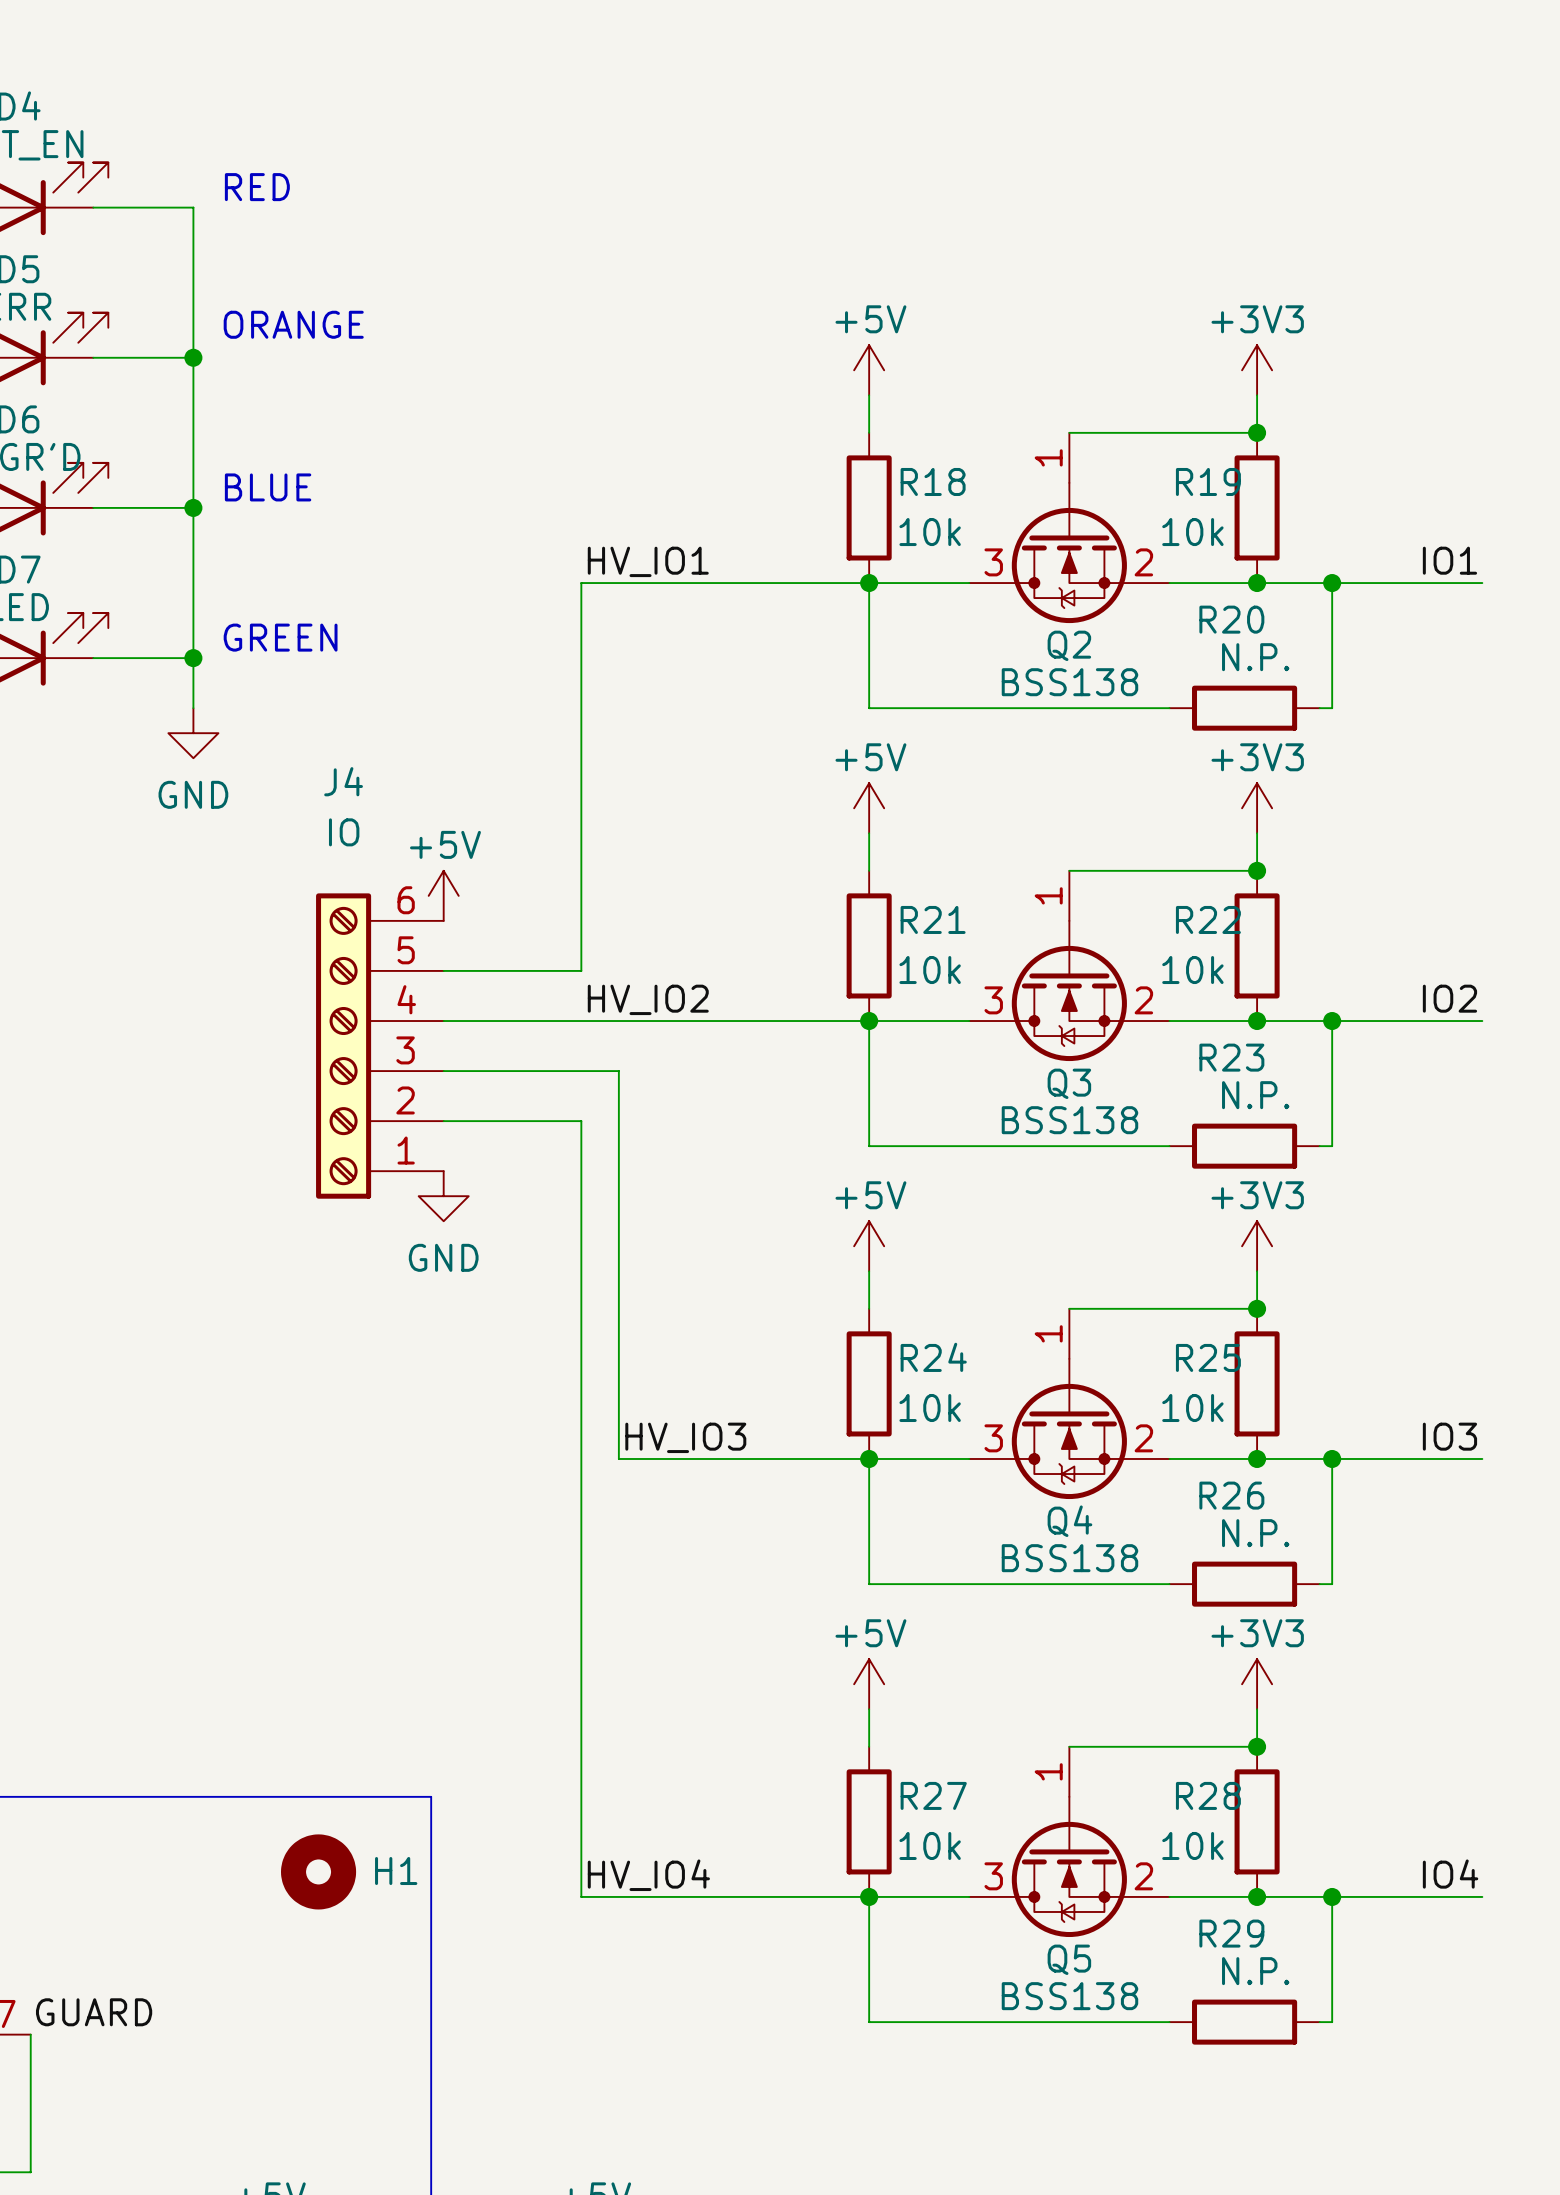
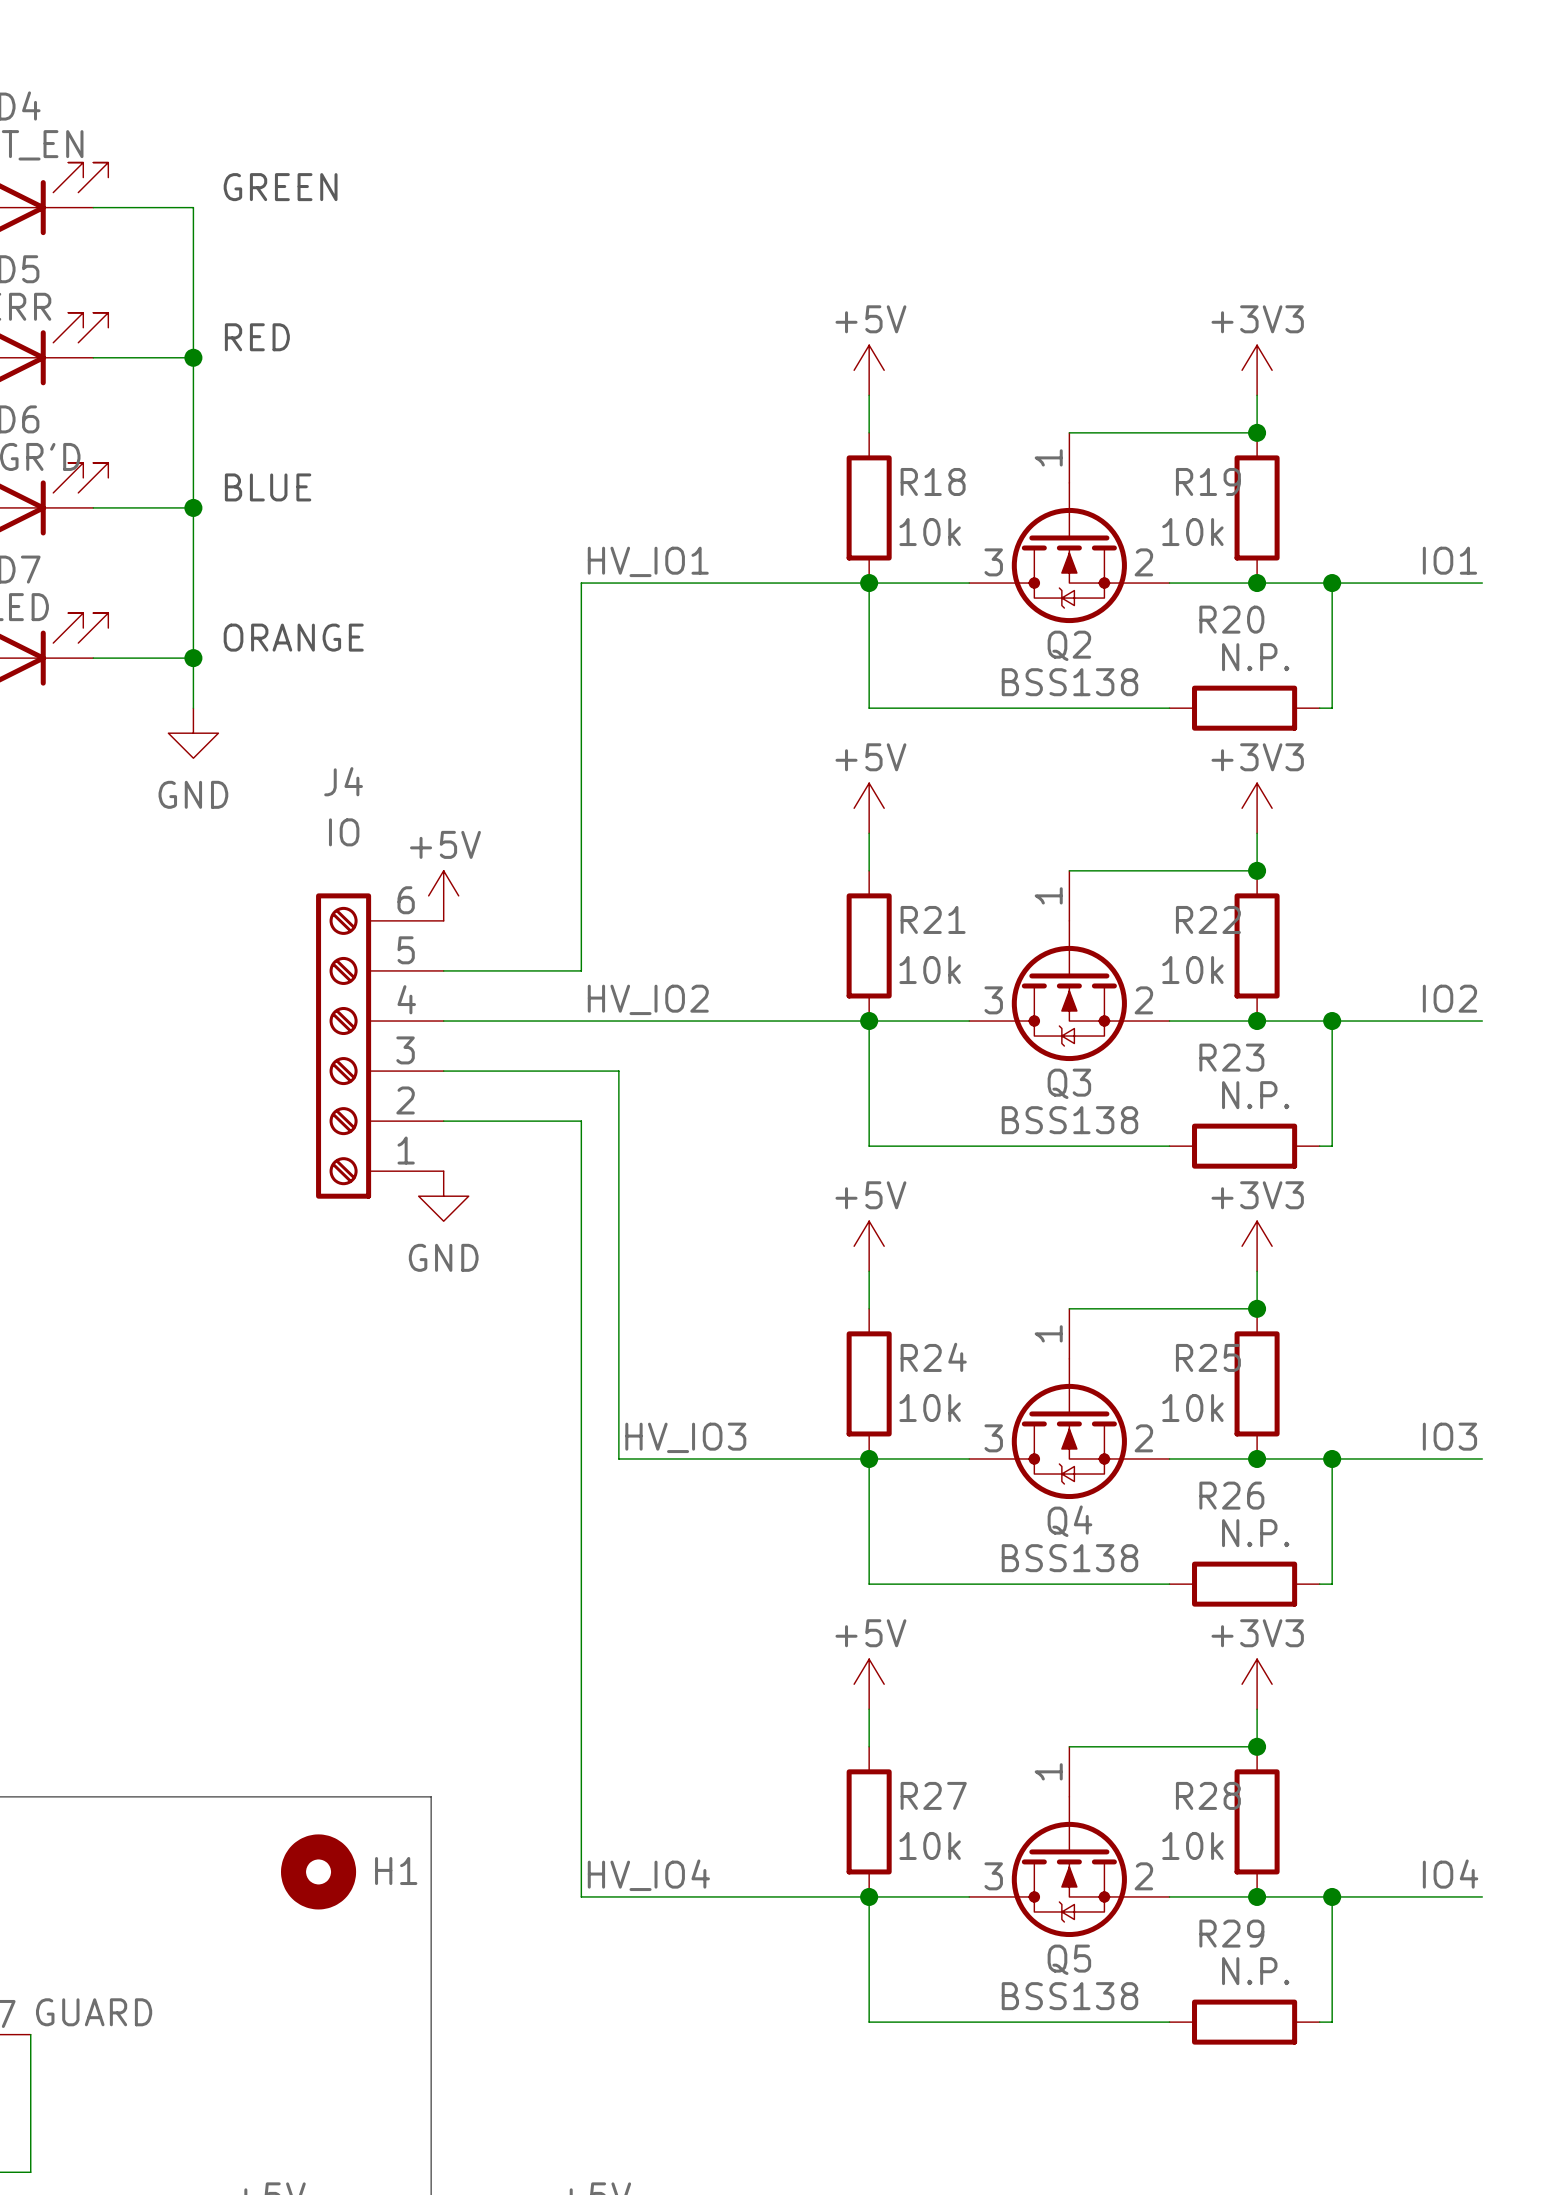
text: RED (257, 187) -> GREEN (280, 187)
text: ORANGE (293, 324) -> RED (257, 337)
text: GREEN (280, 637) -> ORANGE (293, 637)

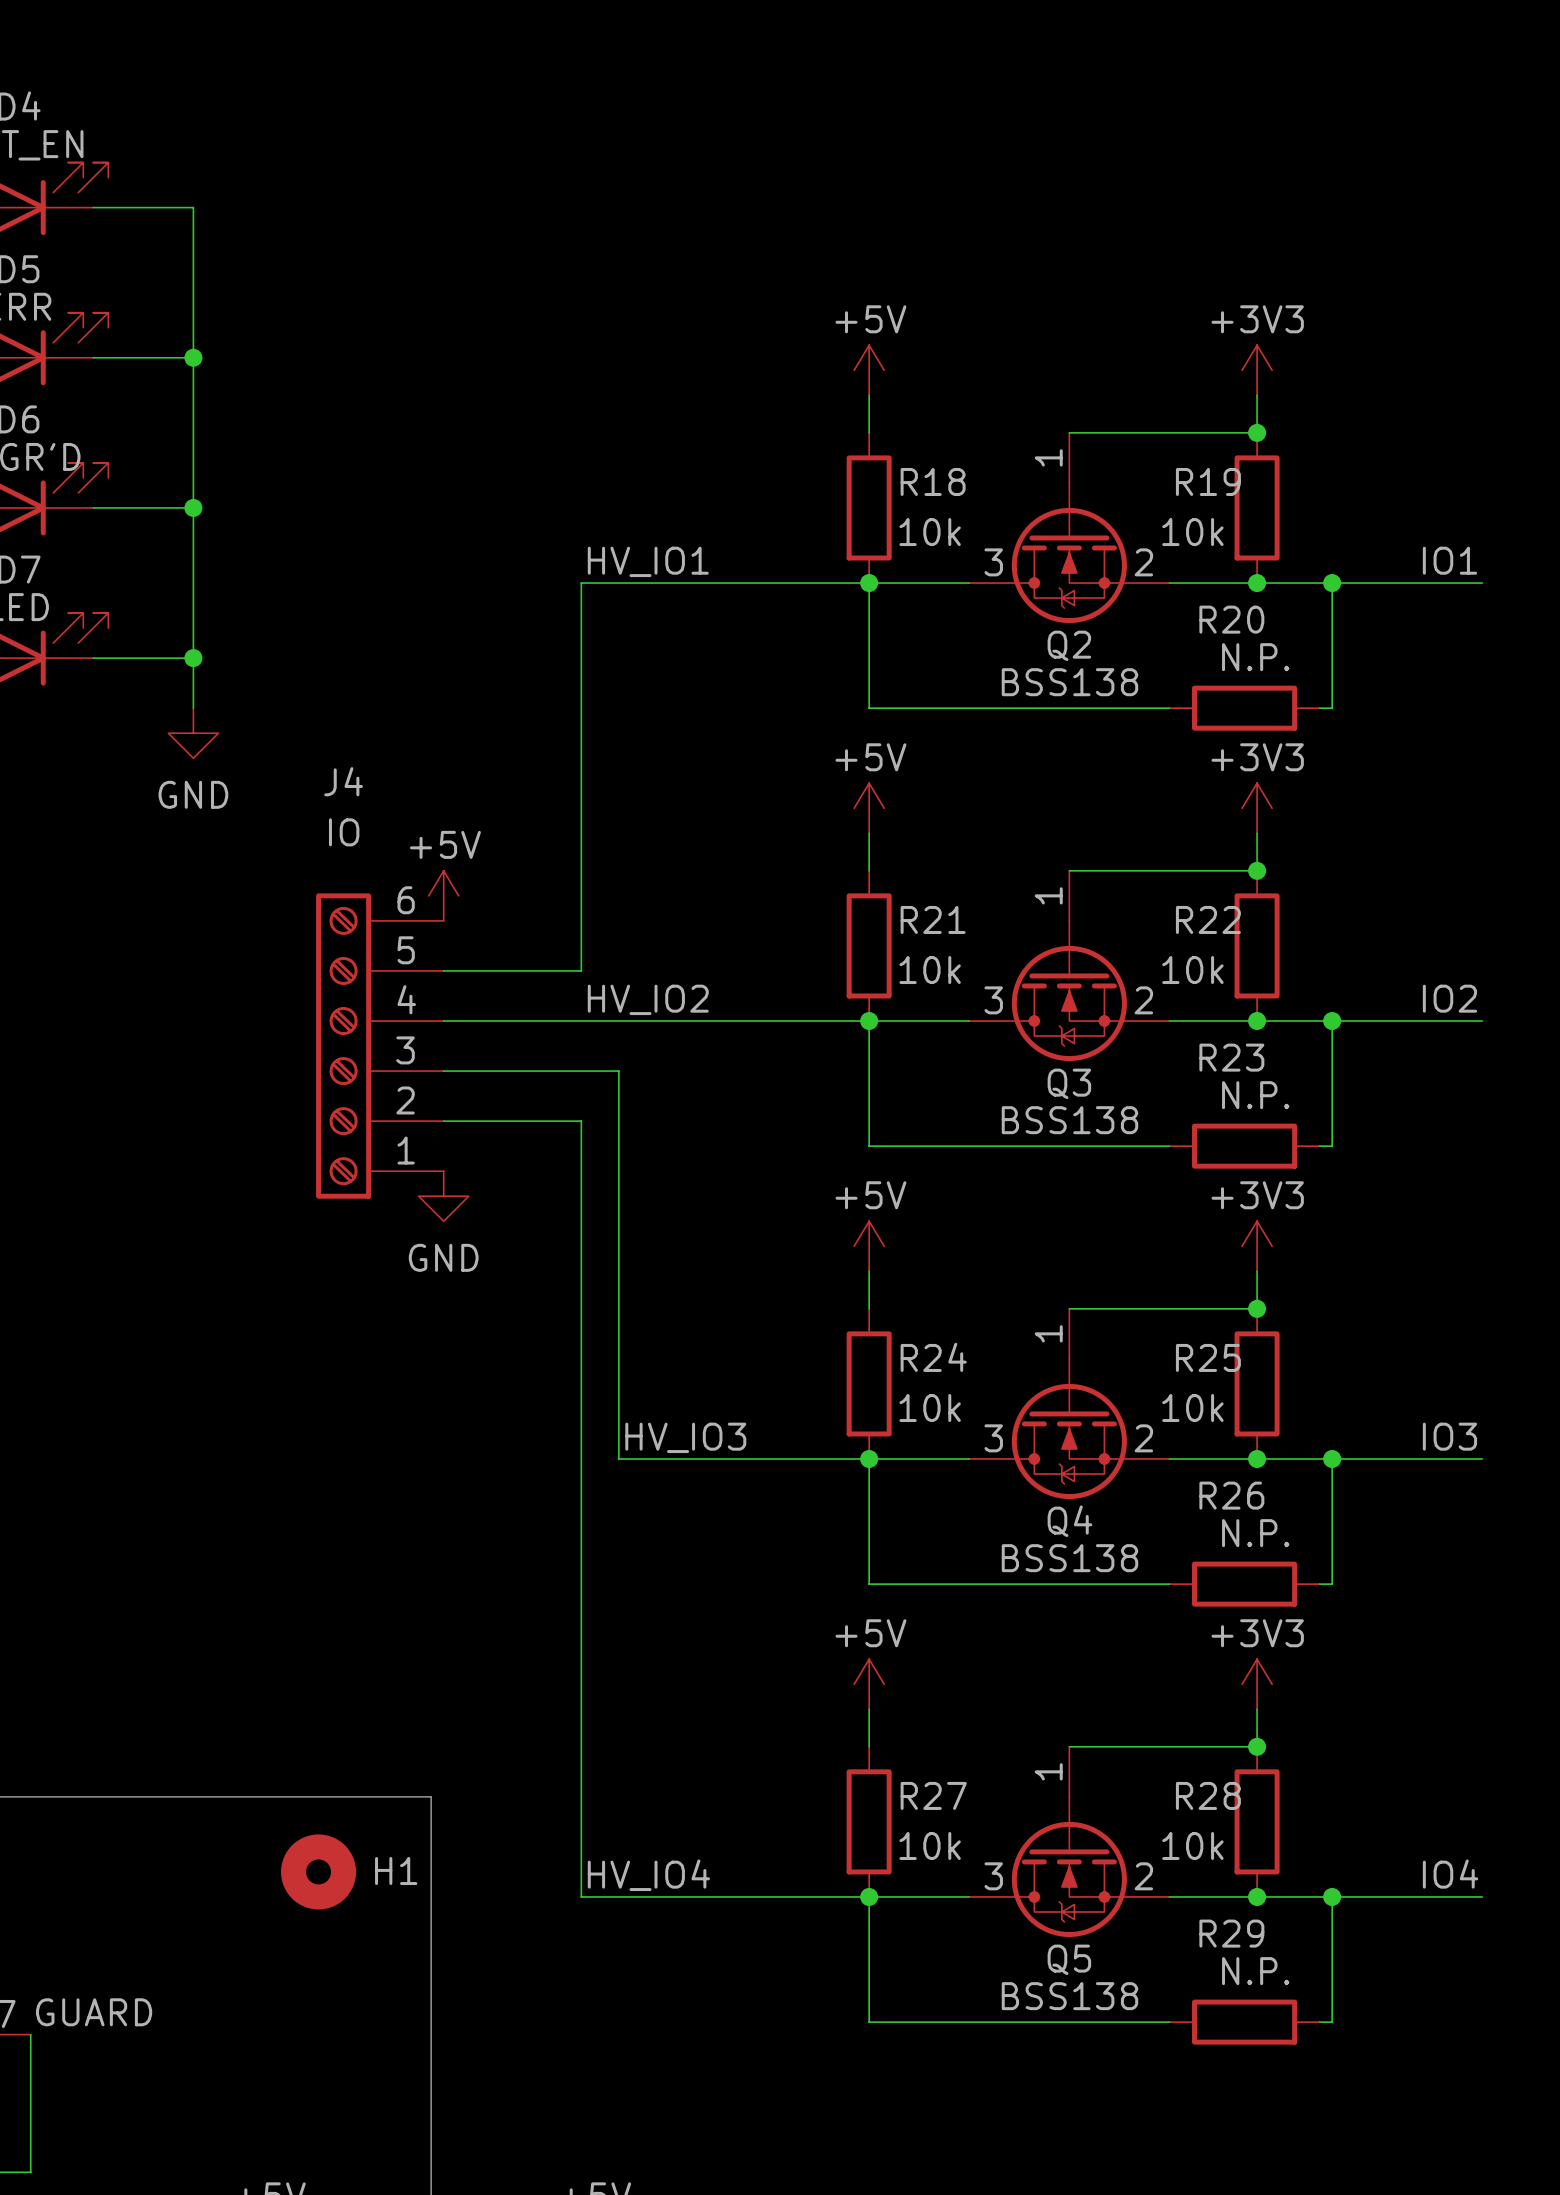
text: GREEN (280, 187) -> none
text: RED (257, 337) -> none
text: BLUE (268, 487) -> none
text: ORANGE (293, 637) -> none

